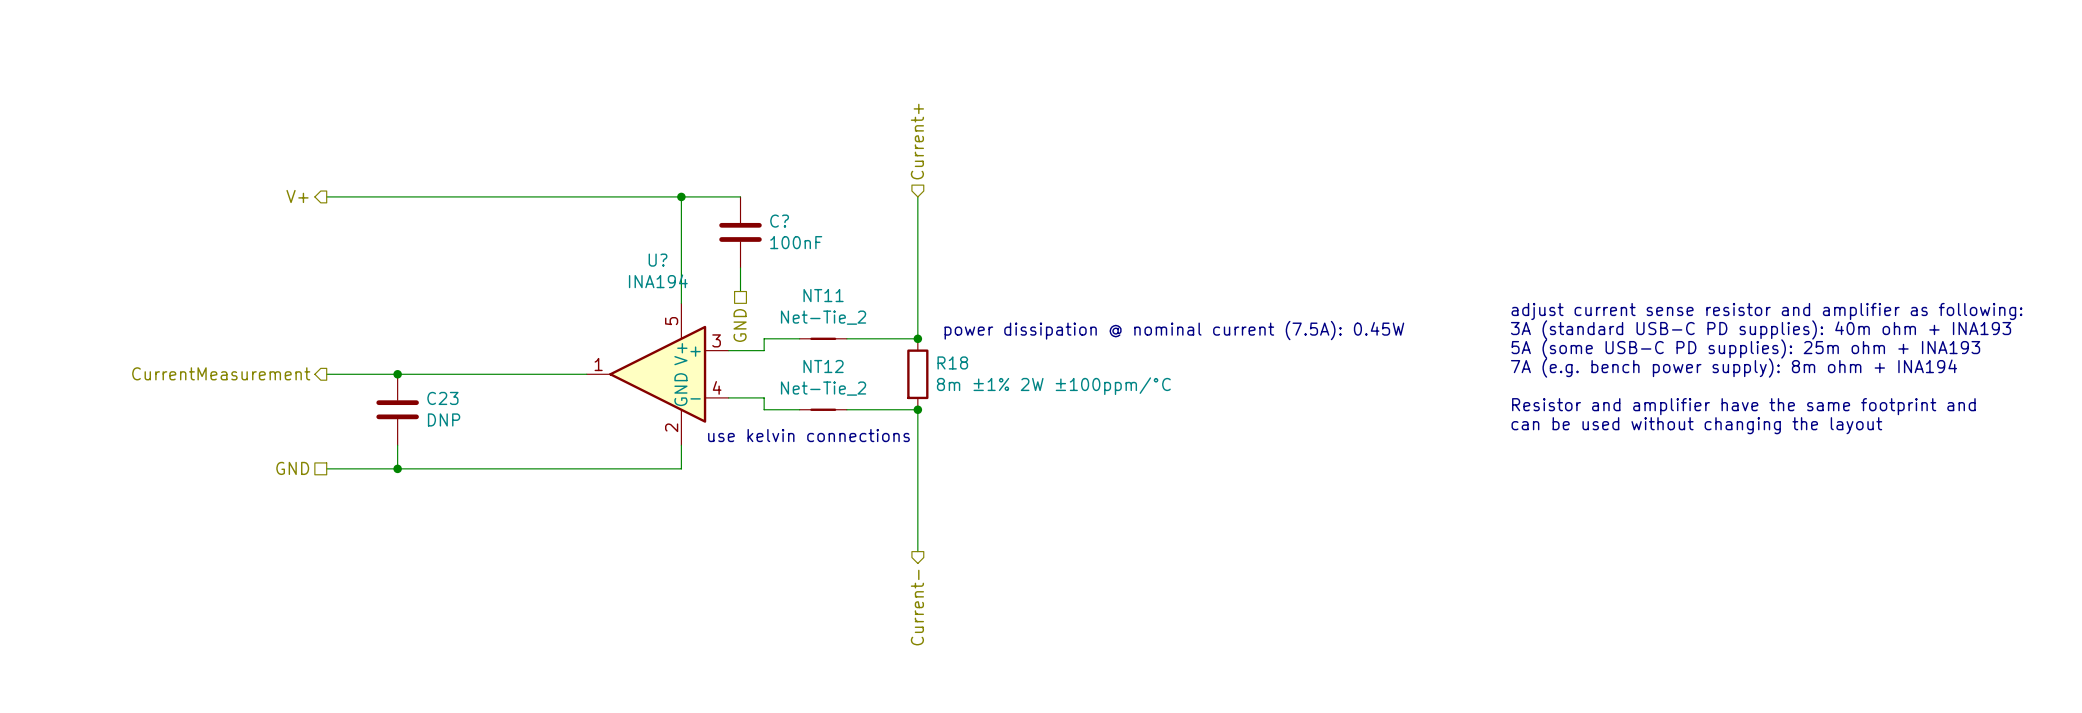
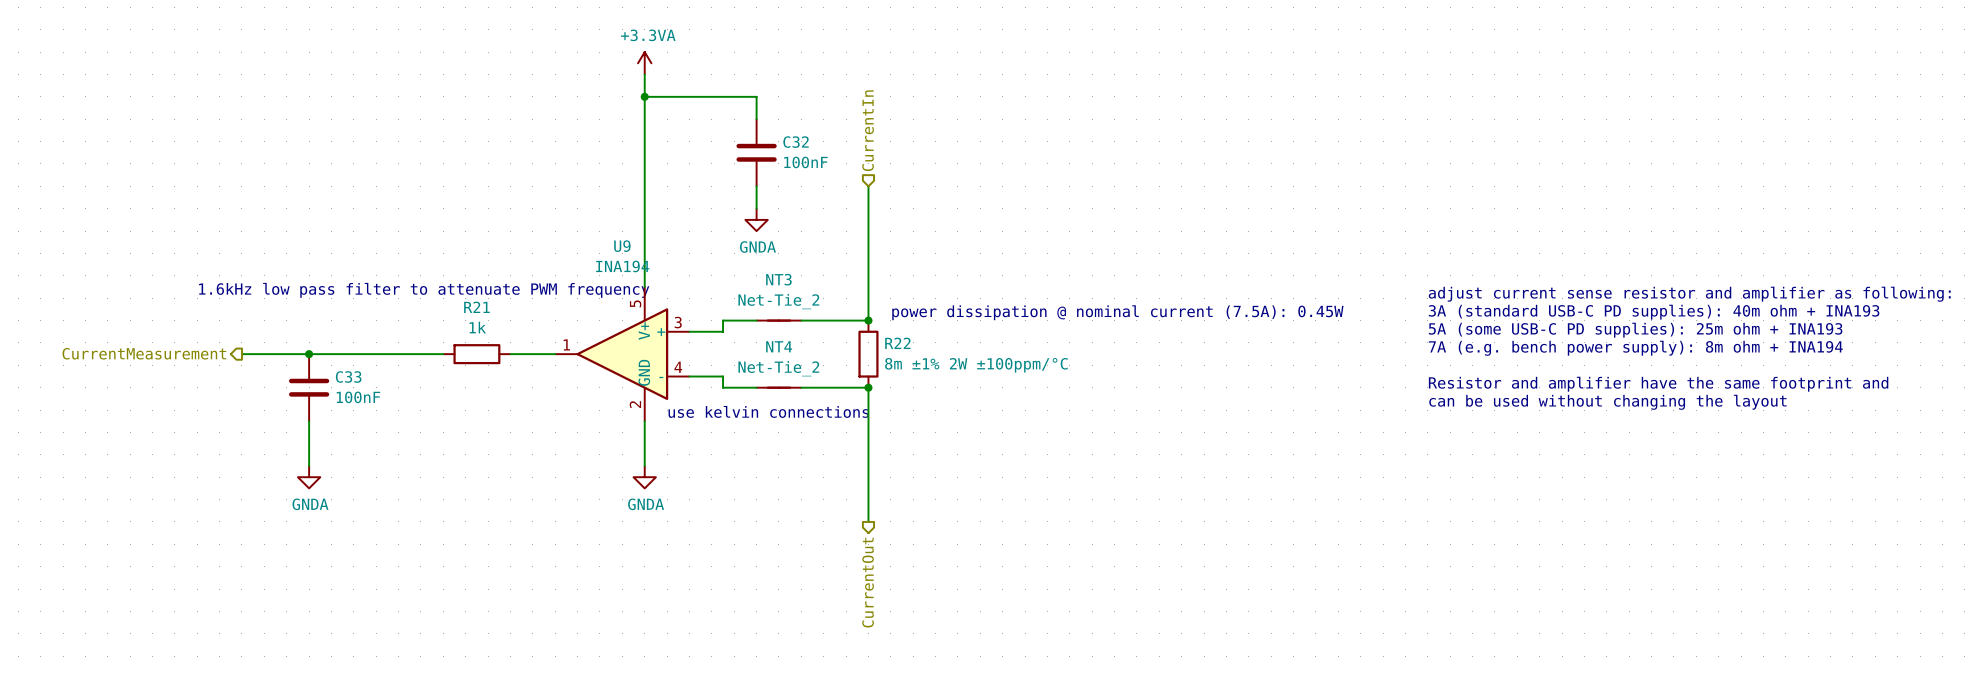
power symbol: none -> +3.3VA (644, 63)
wire: none -> (644, 74) (644, 186)
wire: none -> (644, 96) (756, 96) (756, 119)
junction: none -> (644, 96)
hierarchical label: Current+ (917, 141) -> CurrentIn (868, 130)
C32: none -> 100nF (756, 152)
hierarchical label: V+ (297, 196) -> none
wire: (326, 196) (740, 196) -> none
junction: (681, 196) -> none
C?: 100nF (740, 232) -> none
power symbol: none -> GNDA (756, 219)
U? name: U? (658, 260) -> U9 (622, 246)
wire: (740, 267) (740, 291) -> (756, 186) (756, 208)
NT11 name: NT11 (823, 295) -> NT3 (778, 279)
text: none -> 1.6kHz low pass filter to attenuate PWM frequency (424, 290)
hierarchical label: GND (740, 325) -> none
R18 name: R18 (952, 362) -> R22 (897, 343)
NT12 name: NT12 (823, 366) -> NT4 (779, 346)
hierarchical label position: CurrentMeasurement (221, 373) -> CurrentMeasurement (144, 353)
junction: none -> (309, 354)
junction: (397, 374) -> none
wire: (468, 374) (539, 374) -> (241, 354) (309, 354)
R21: none -> 1k (476, 354)
C33: none -> 100nF (309, 387)
C23: DNP (397, 409) -> none
wire: none -> (309, 421) (309, 466)
wire: (397, 445) (397, 468) -> none
hierarchical label: GND (292, 468) -> none
wire: (326, 468) (681, 468) -> (644, 466) (644, 443)
junction: (397, 468) -> none
power symbol: none -> GNDA (309, 477)
power symbol: none -> GNDA (644, 477)
hierarchical label: Current- (917, 607) -> CurrentOut (868, 582)

